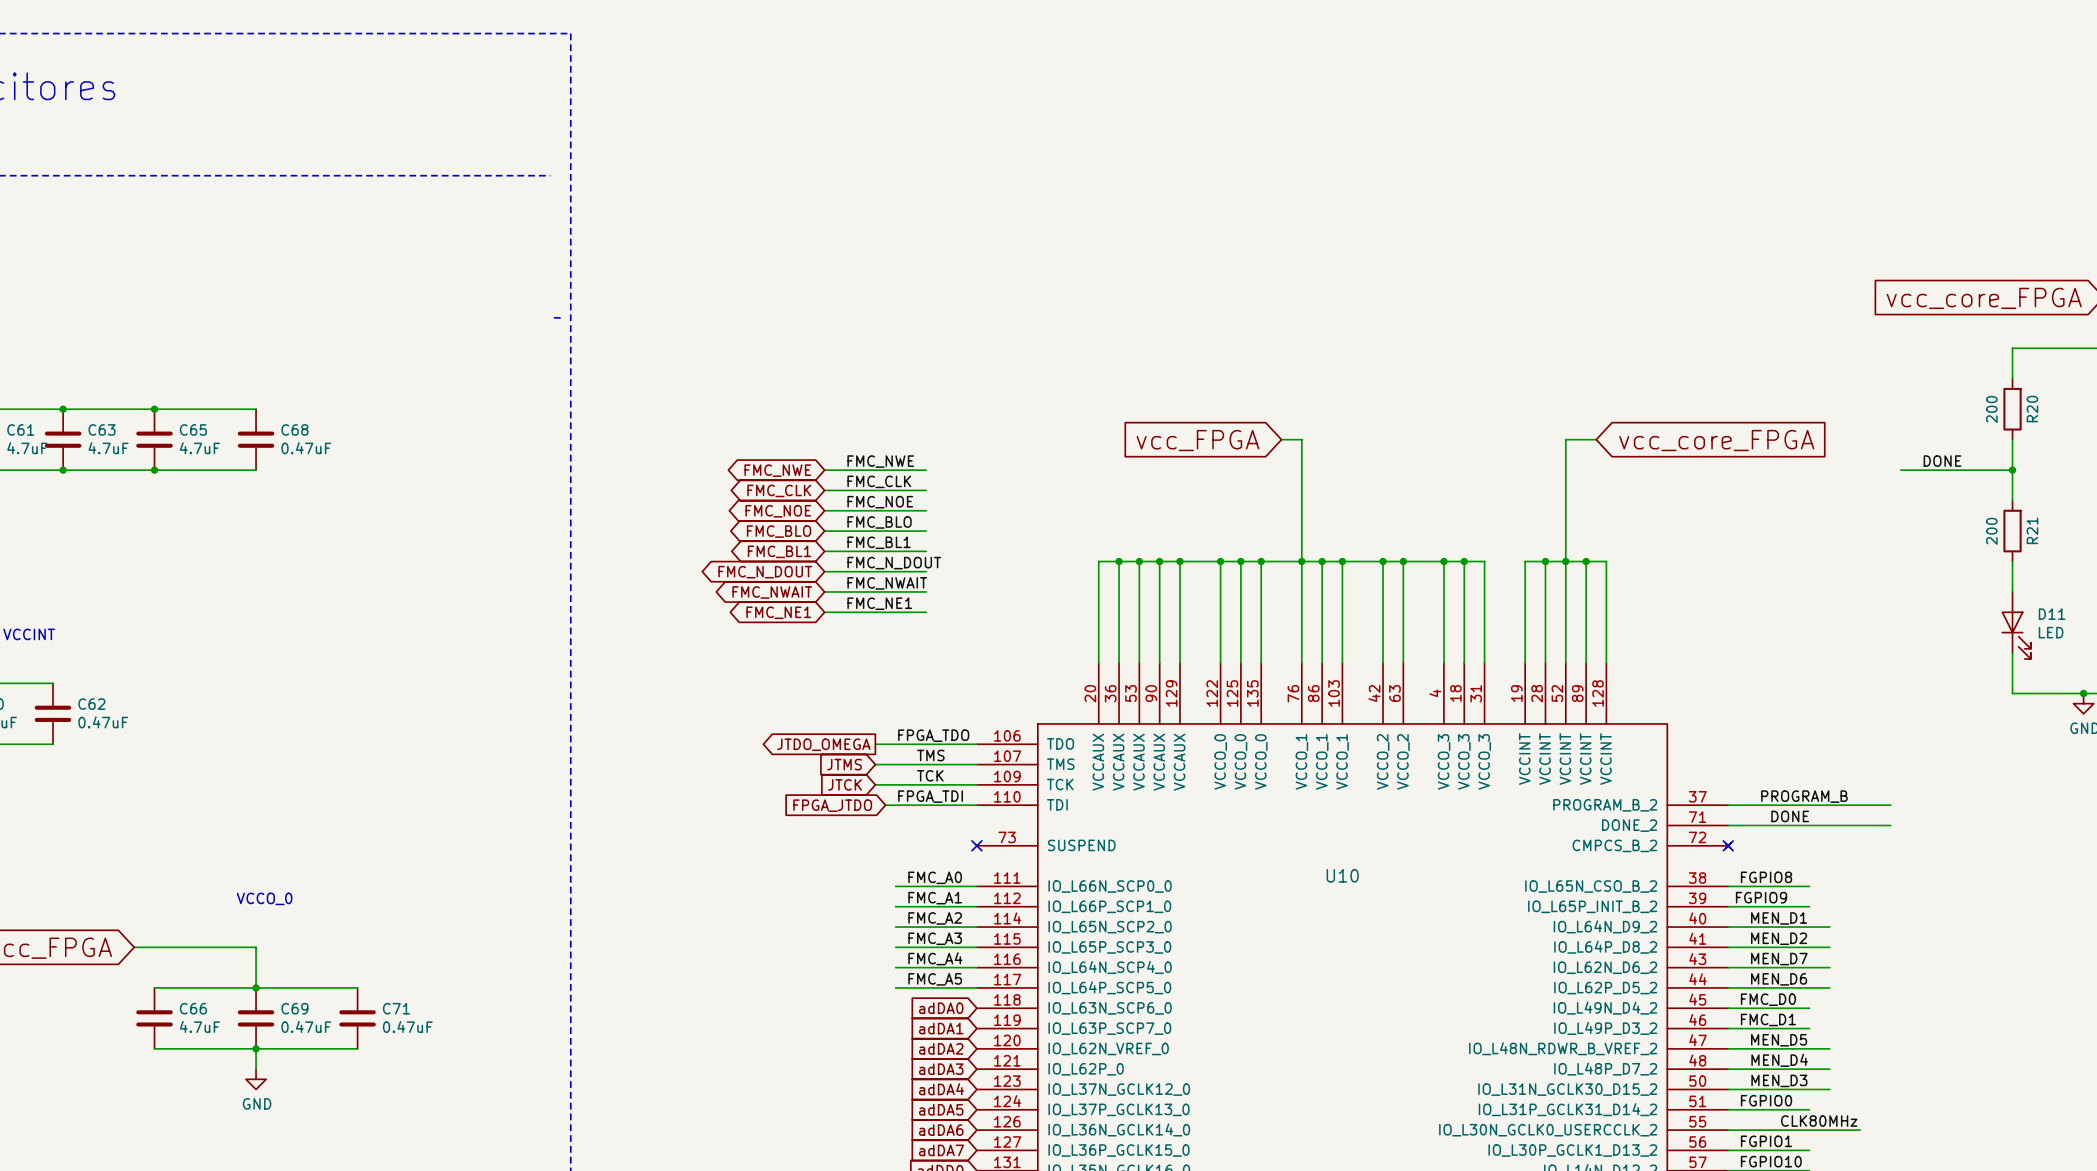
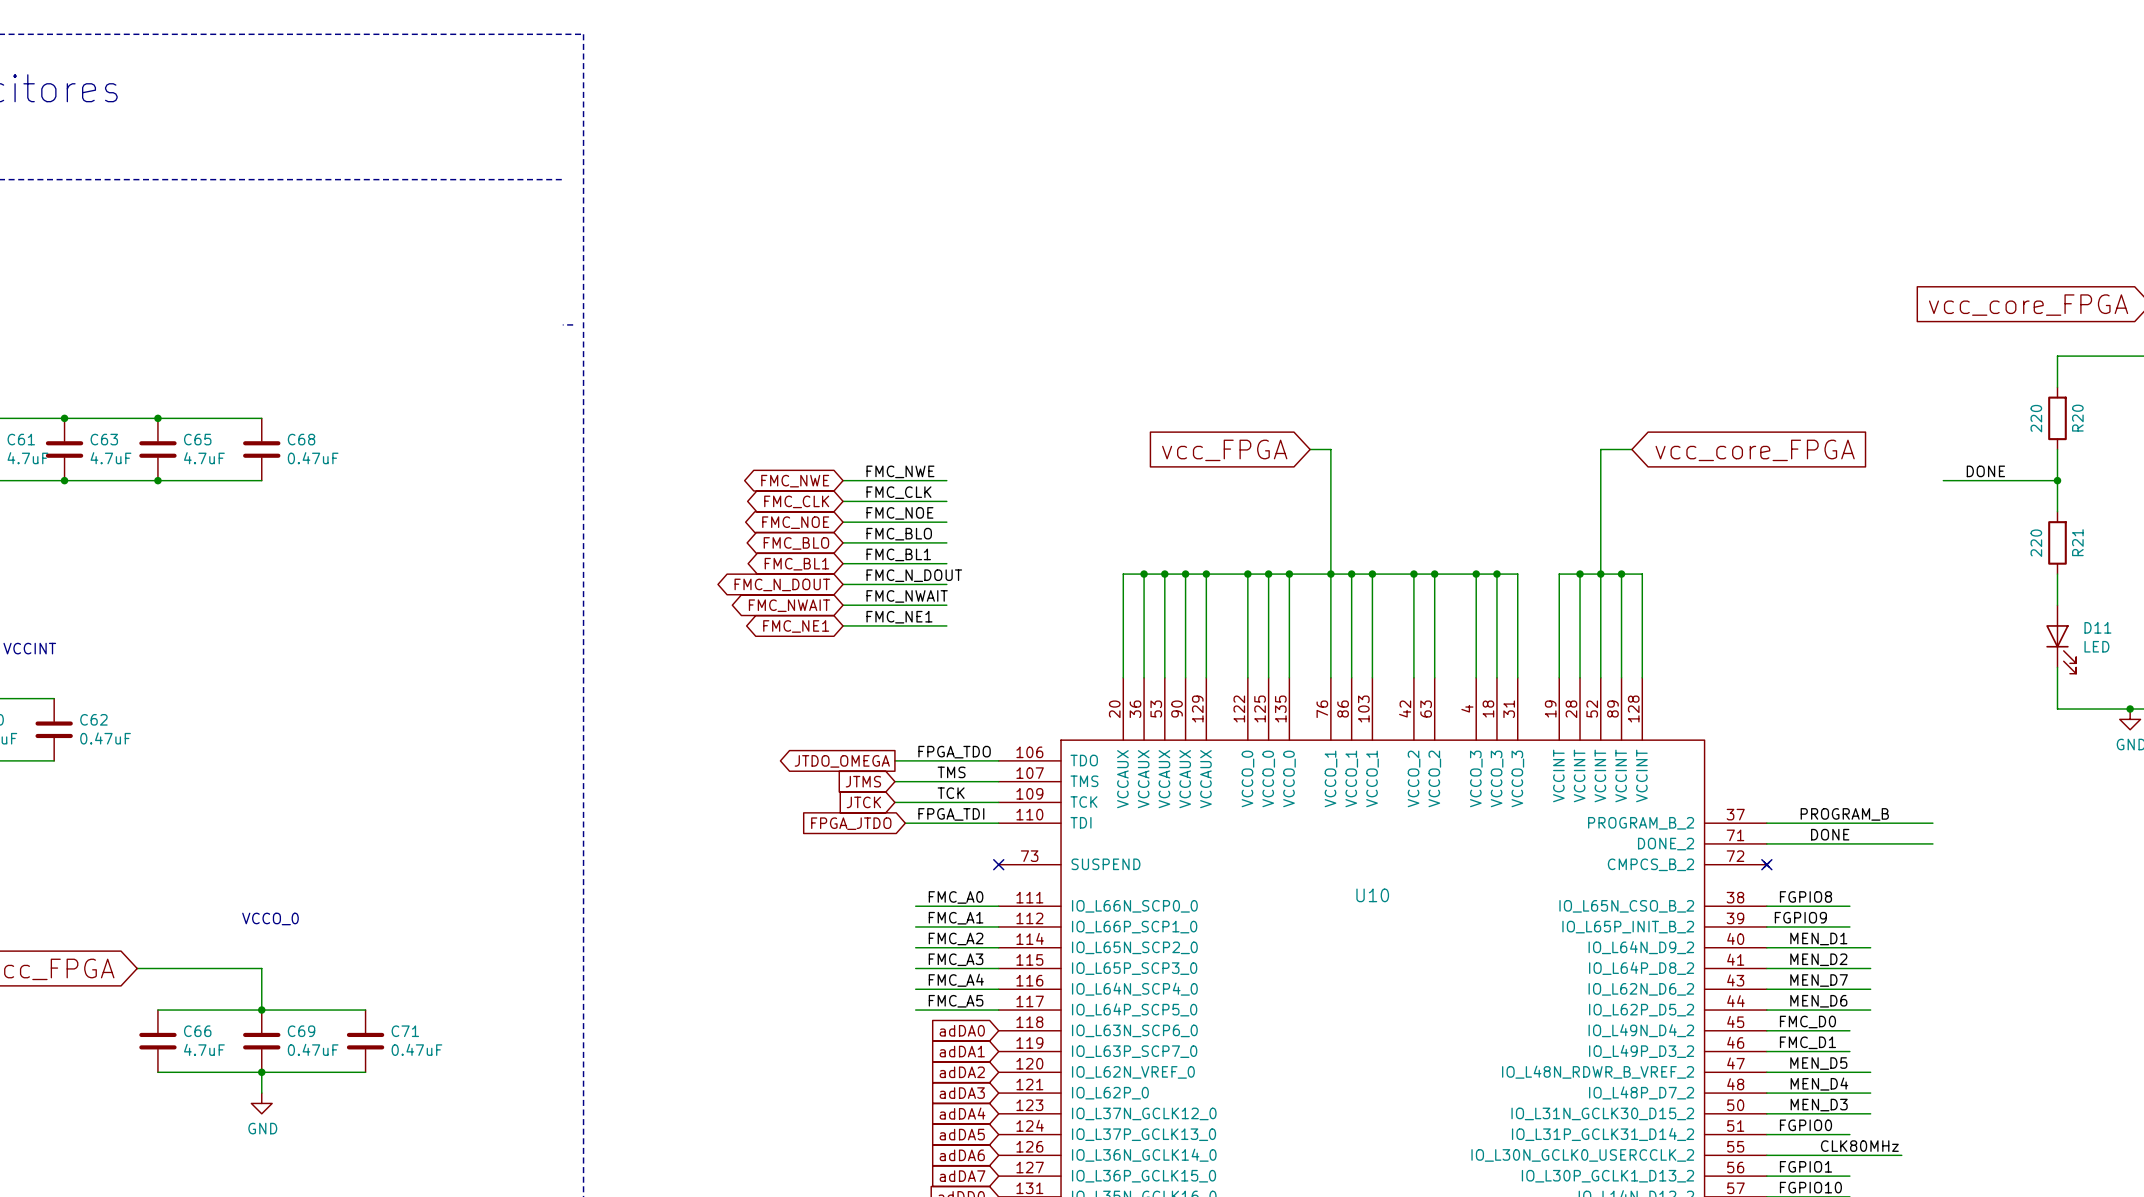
R20 value: 200 (1991, 409) -> 220 (2036, 418)
R21 value: 200 (1991, 531) -> 220 (2036, 543)

